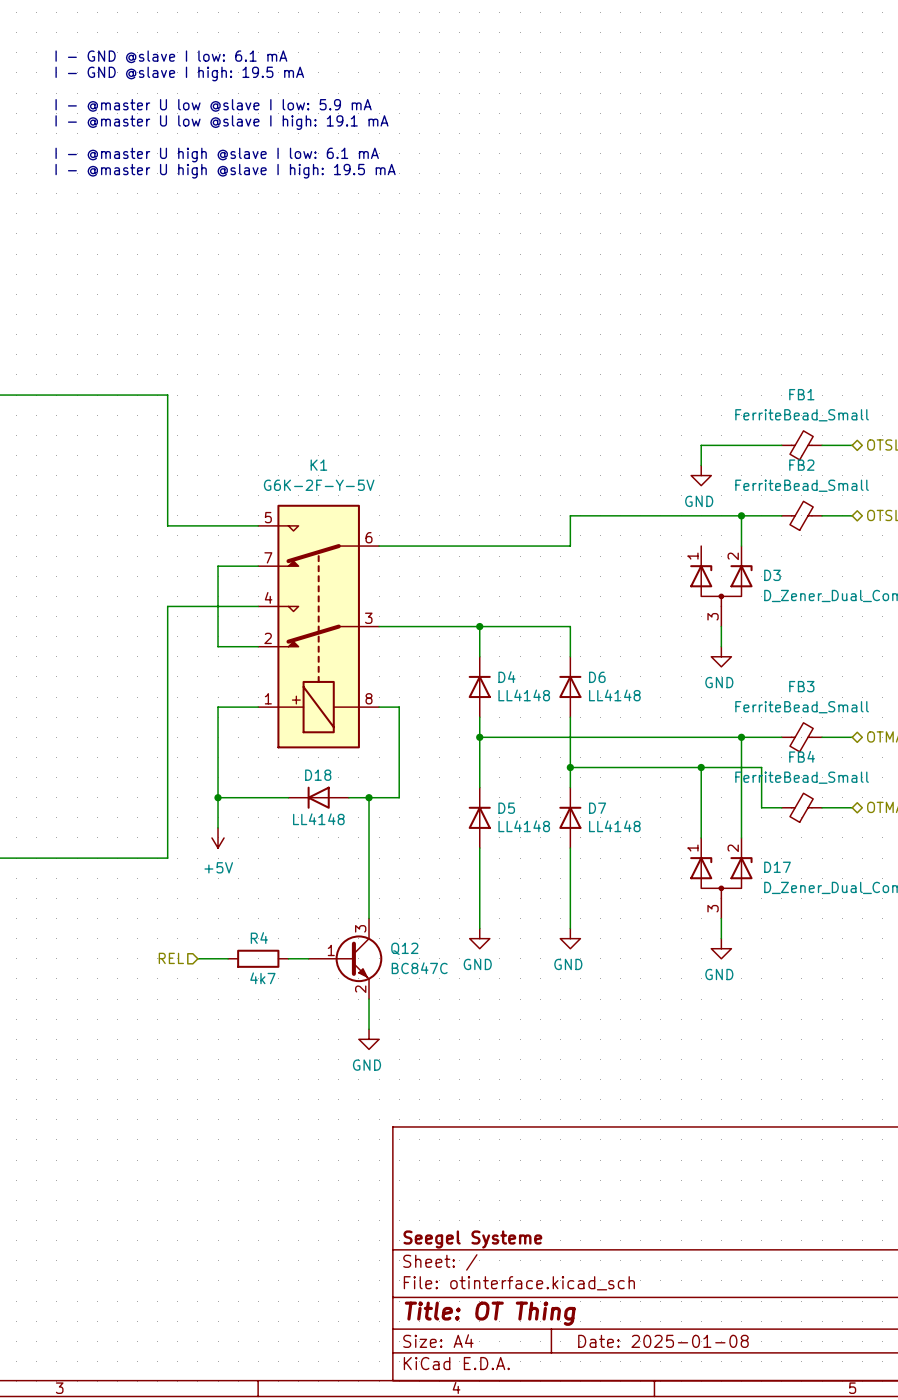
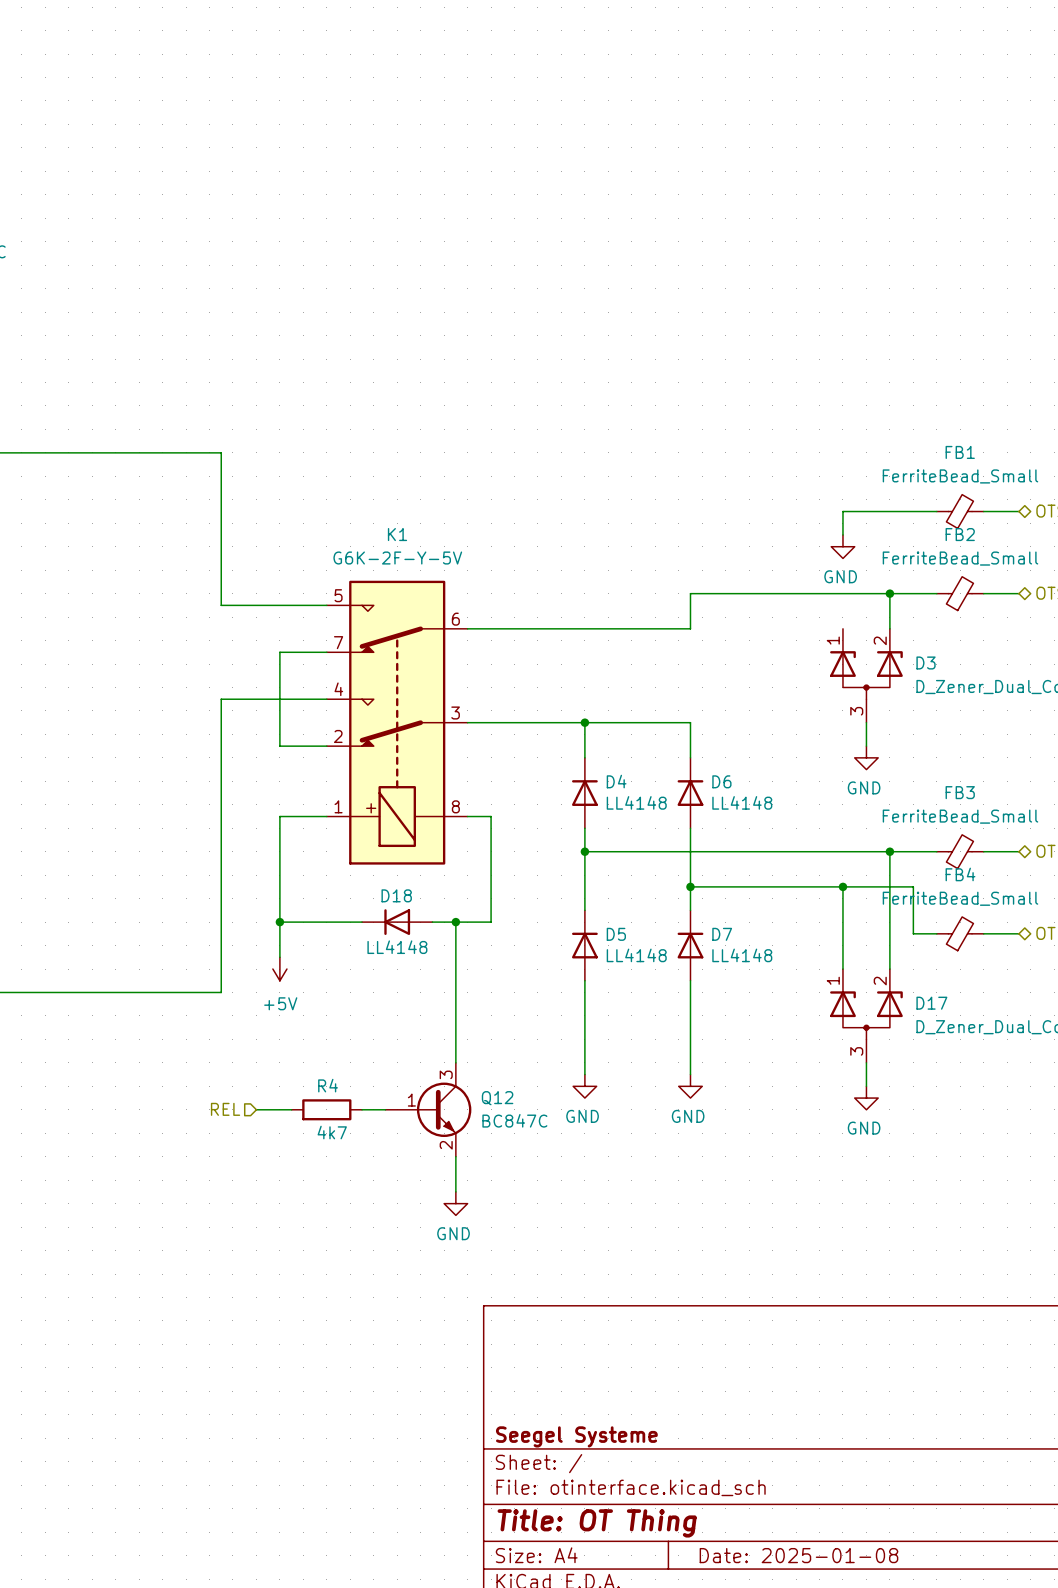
text: I - GND @slave I low: 6.1 mA (171, 56) -> none
text: I - GND @slave I high: 19.5 mA (179, 73) -> none
text: I - @master U low @slave I low: 5.9 mA (213, 105) -> none
text: I - @master U low @slave I high: 19.1 mA (221, 122) -> none
text: I - @master U high @slave I low: 6.1 mA (217, 155) -> none
text: I - @master U high @slave I high: 19.5 mA (225, 171) -> none

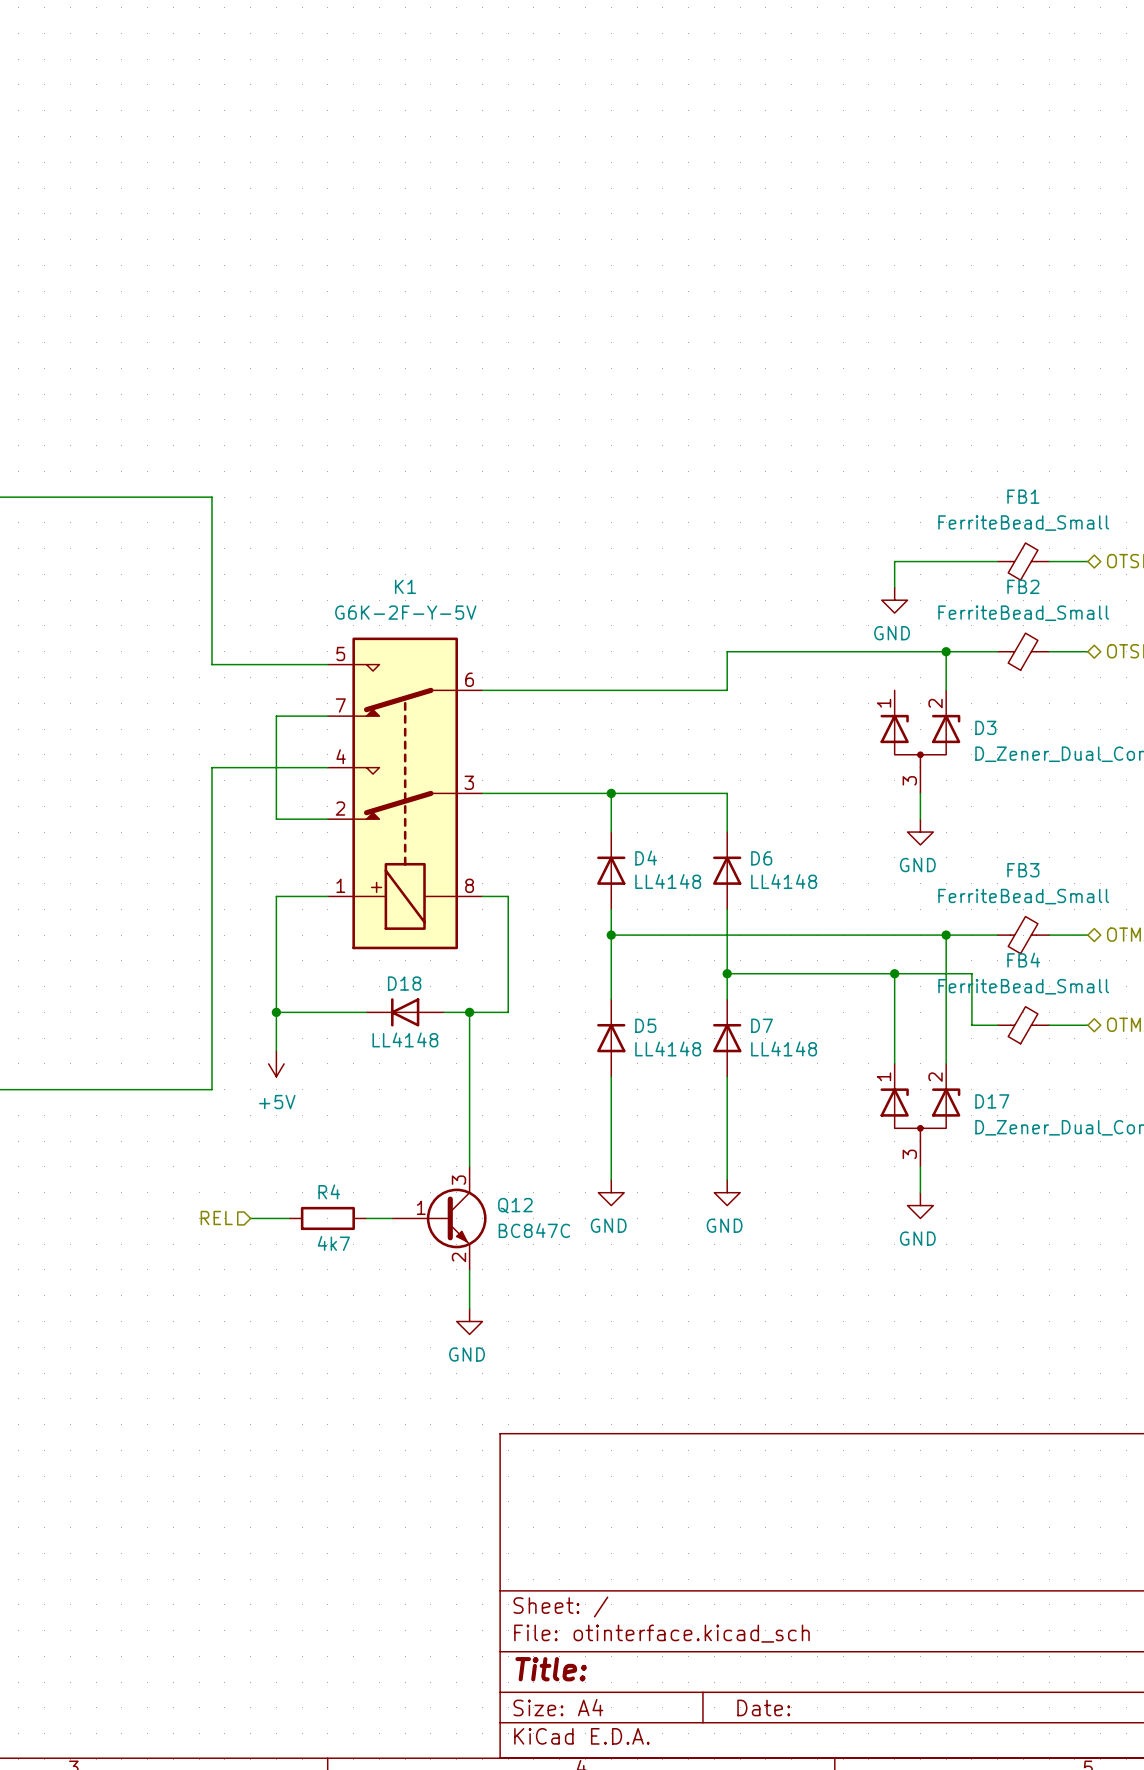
title block: Seegel Systeme (576, 1436) -> none
title block: Title: OT Thing (597, 1523) -> Title: (551, 1669)
title block: Date: 2025-01-08 (798, 1555) -> Date: (763, 1707)

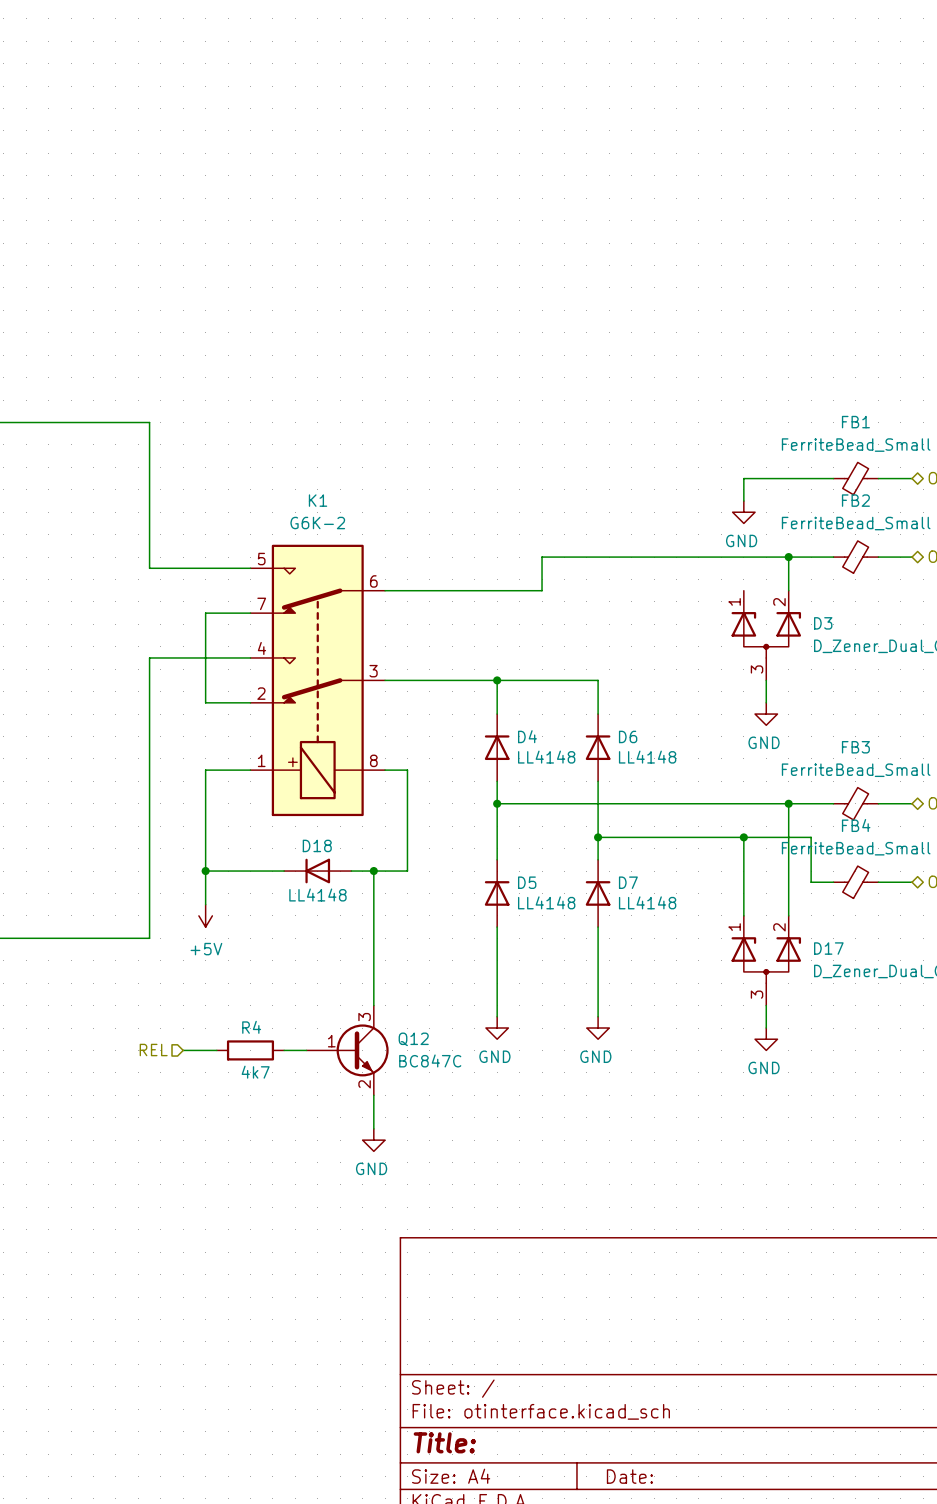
K1 value: G6K-2F-Y-5V (405, 612) -> G6K-2 (317, 523)
wire: (727, 651) (727, 690) (662, 690) -> (598, 557) (542, 557) (542, 590)

